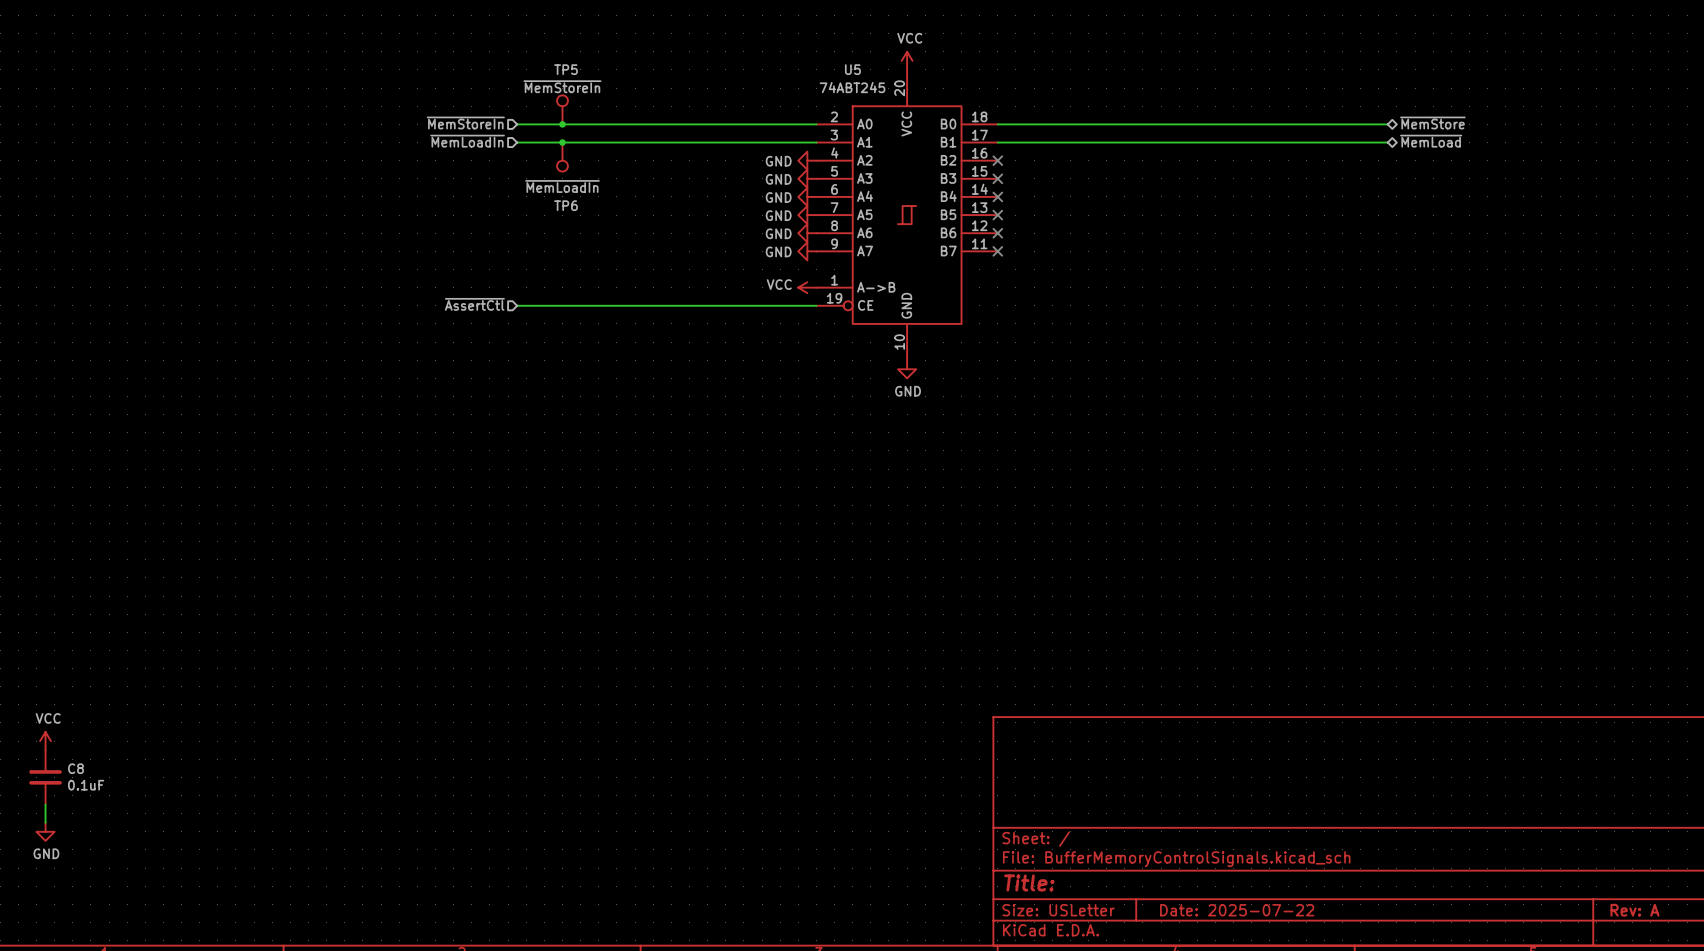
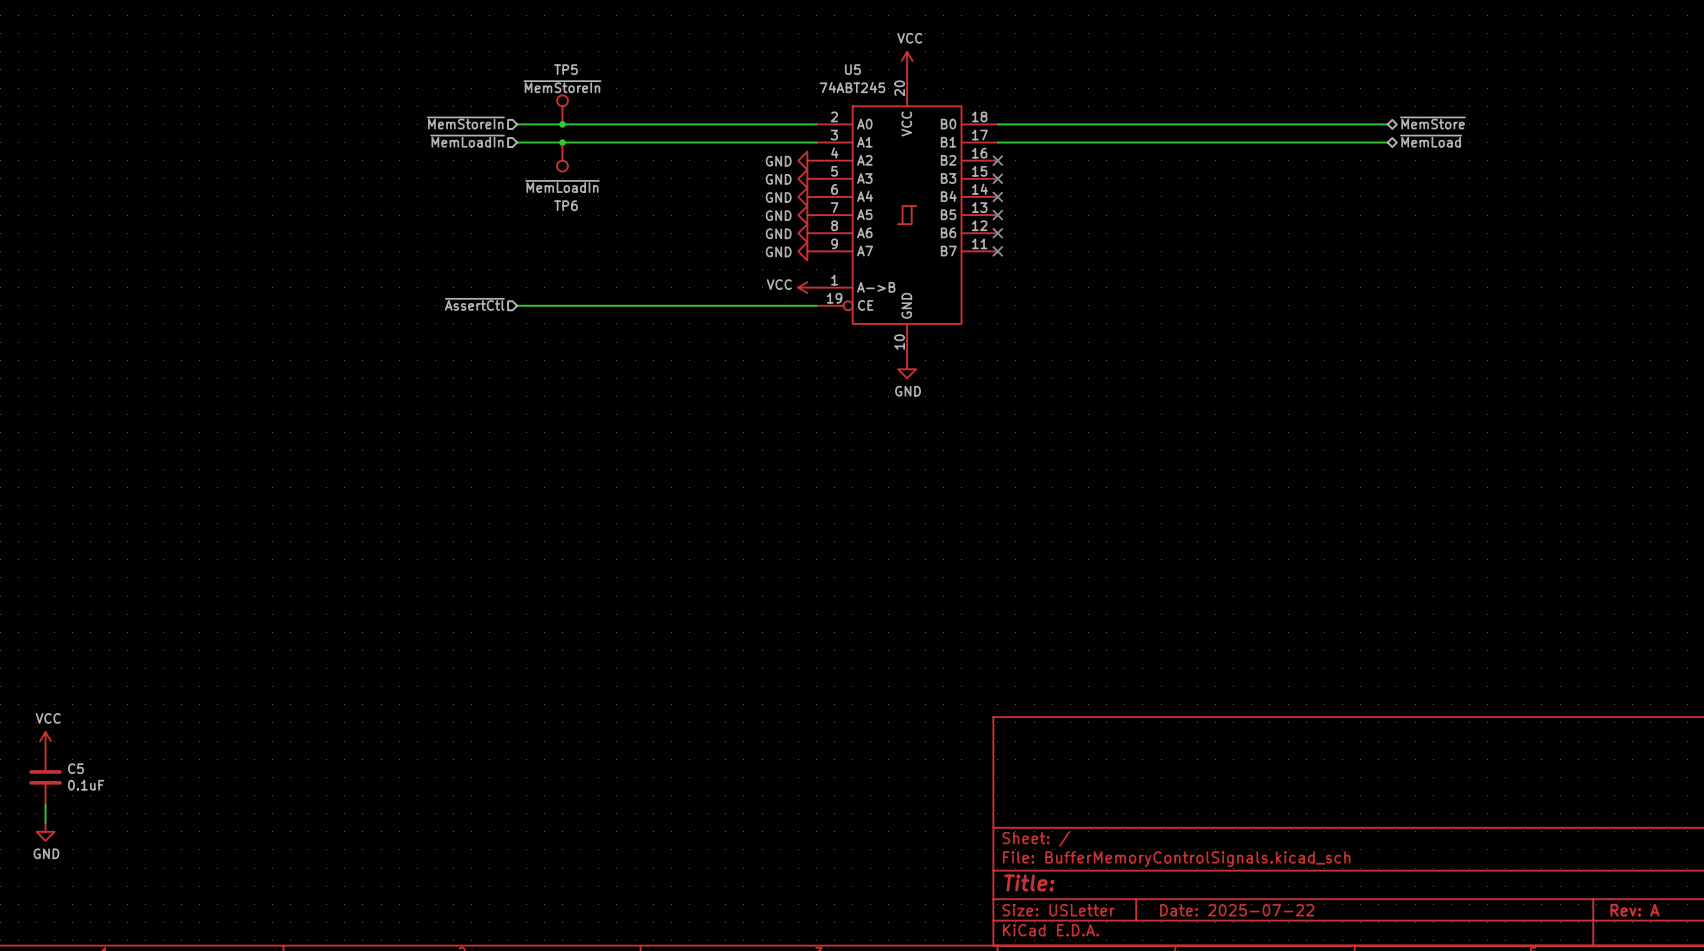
C8 name: C8 (75, 768) -> C5 (75, 768)

